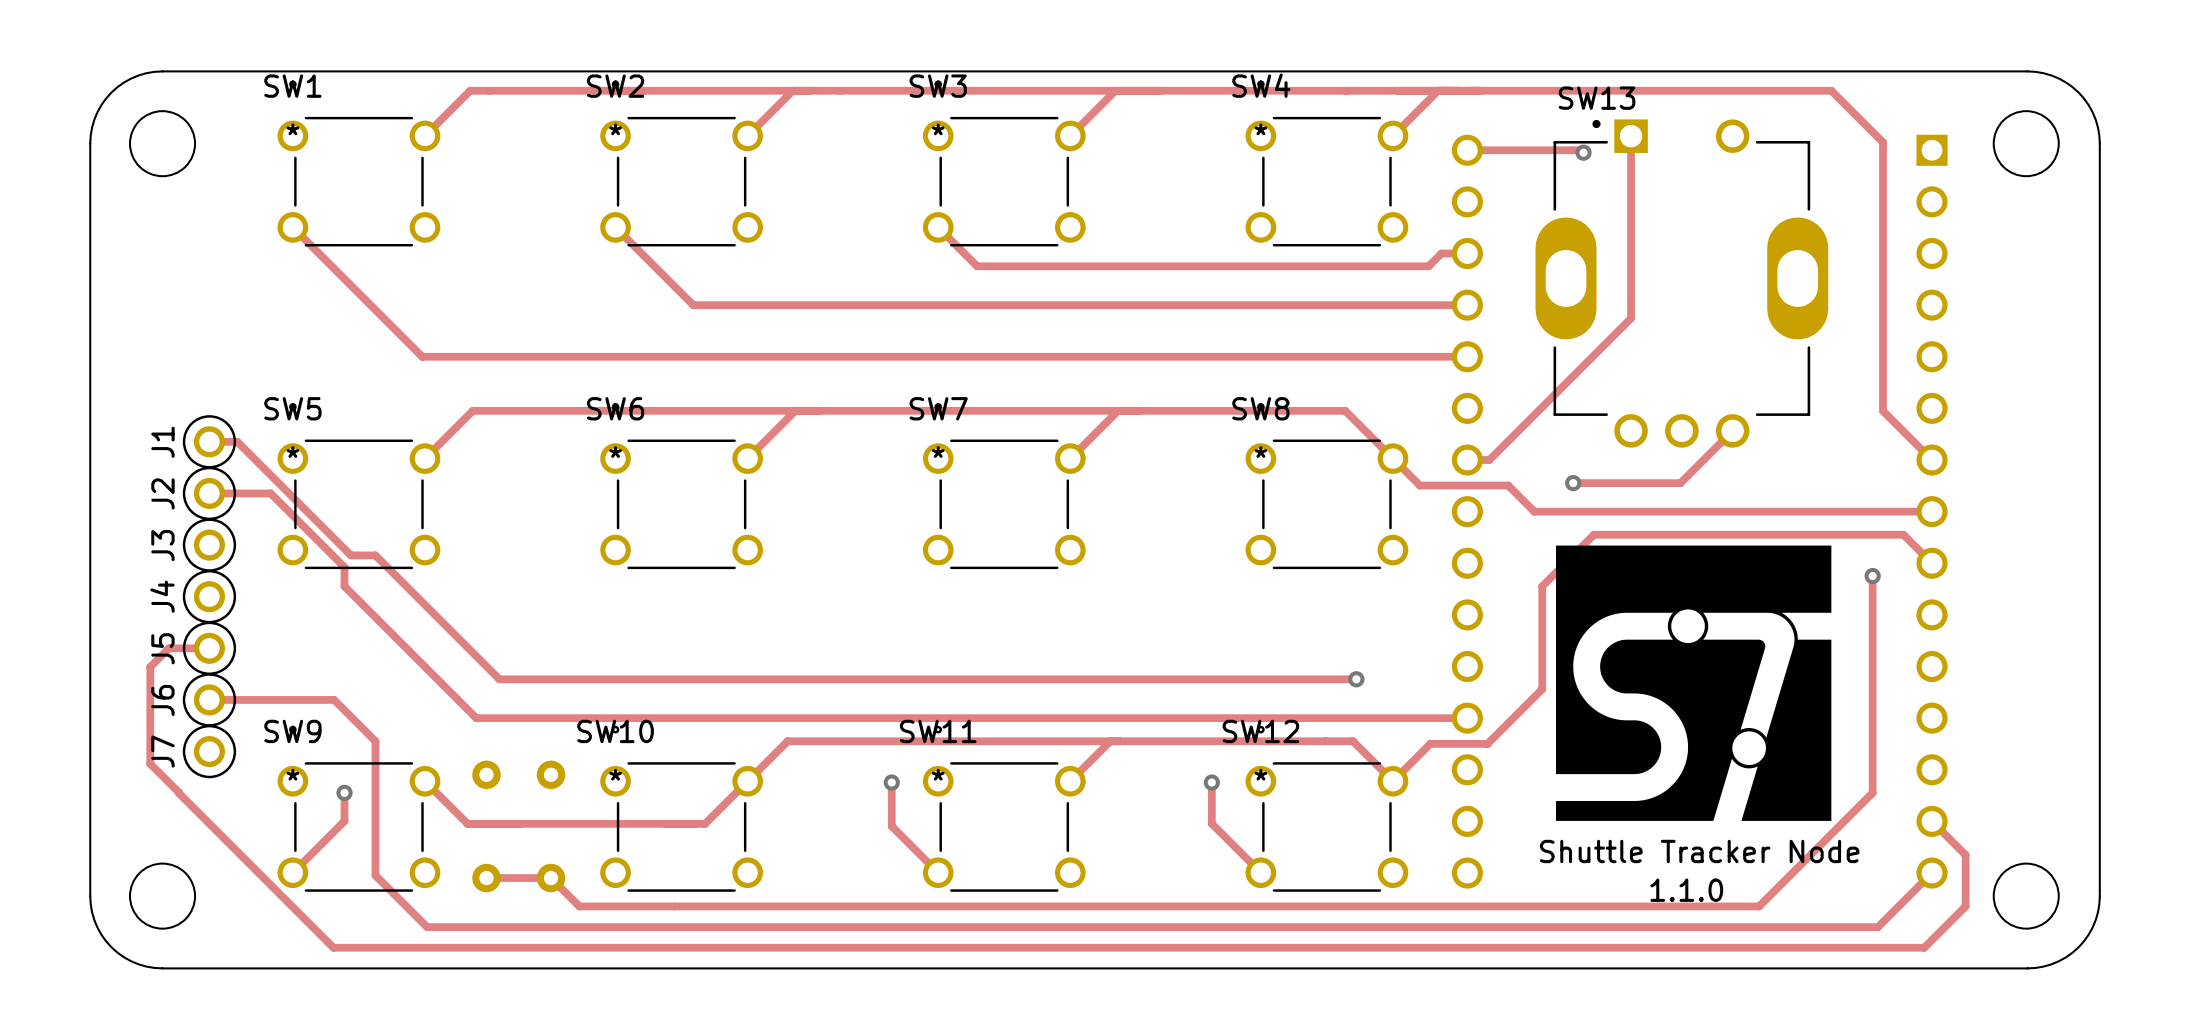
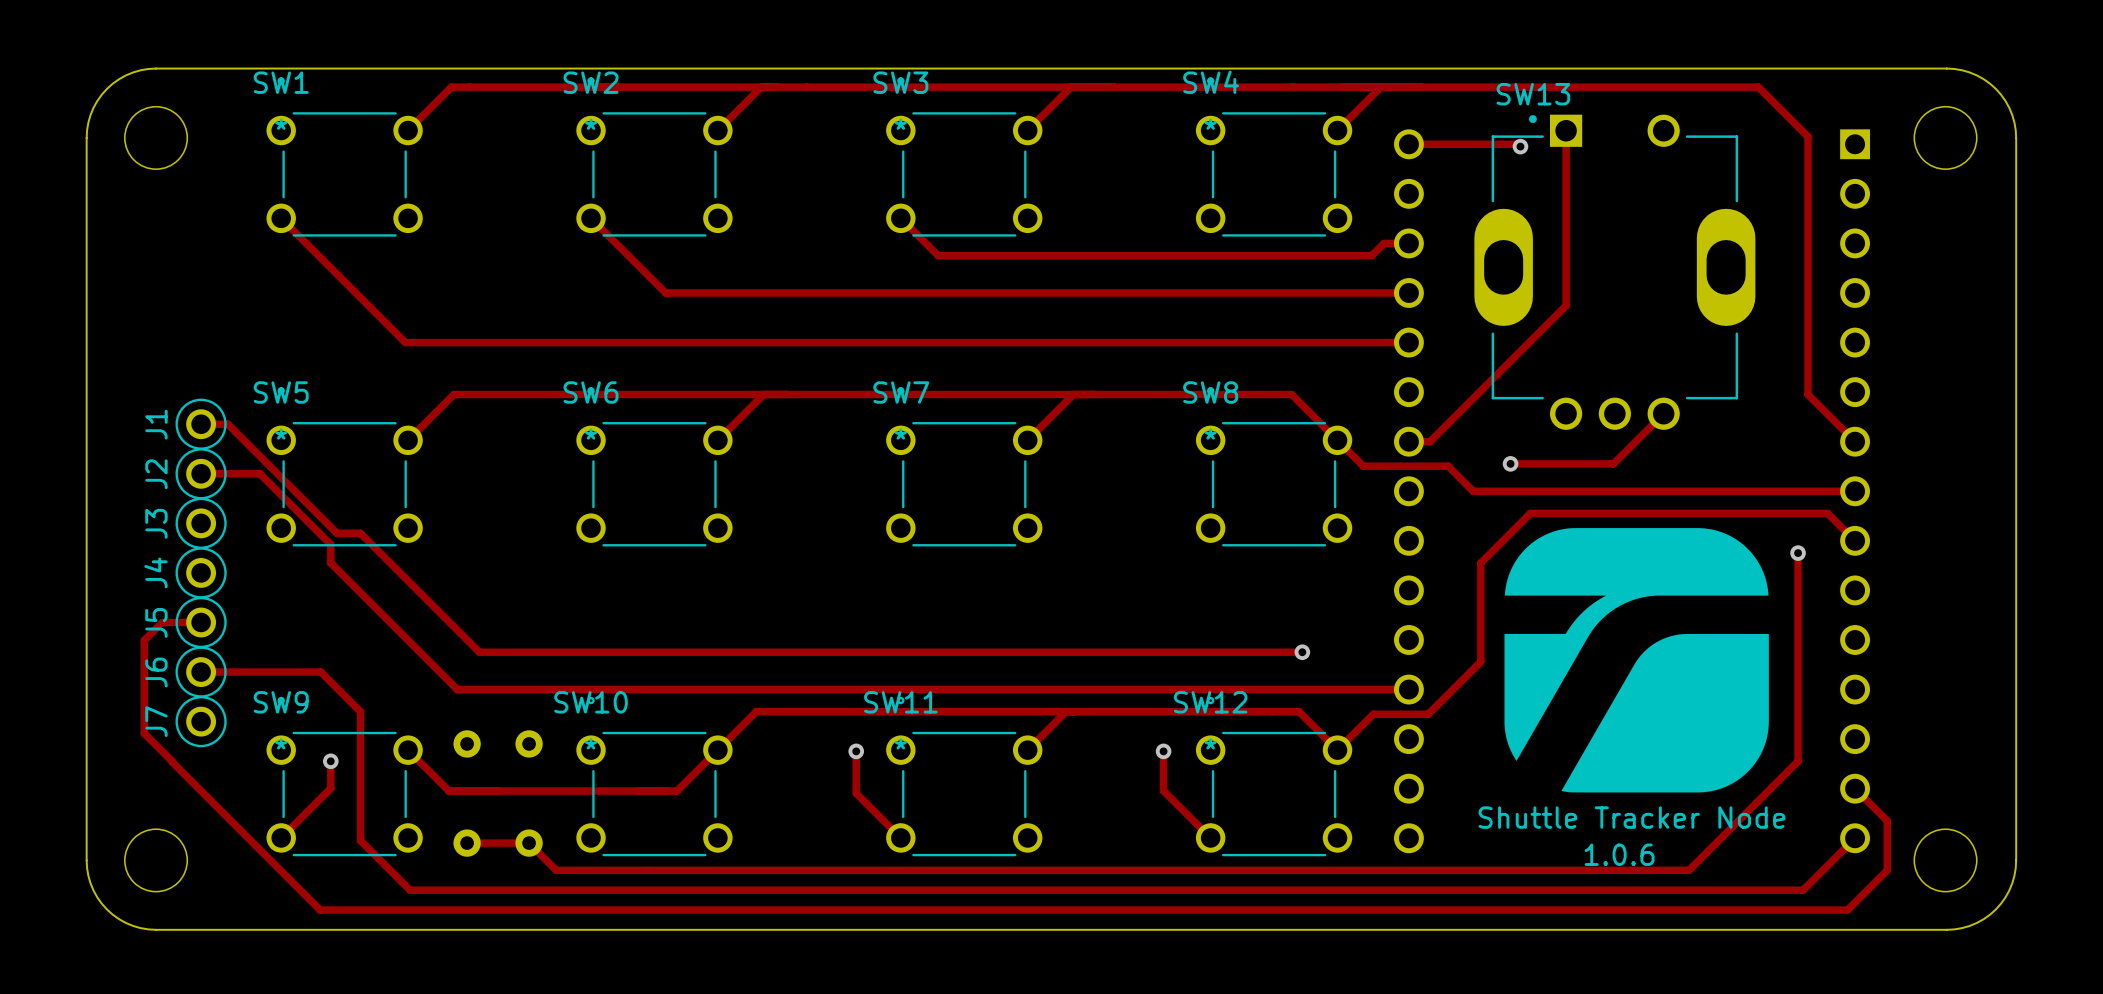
drawing shape: [1556, 545, 1832, 821] -> [1504, 528, 1769, 761]
drawing: none -> [1561, 633, 1769, 793]
text: 1.1.0 (1686, 890) -> 1.0.6 (1619, 854)

